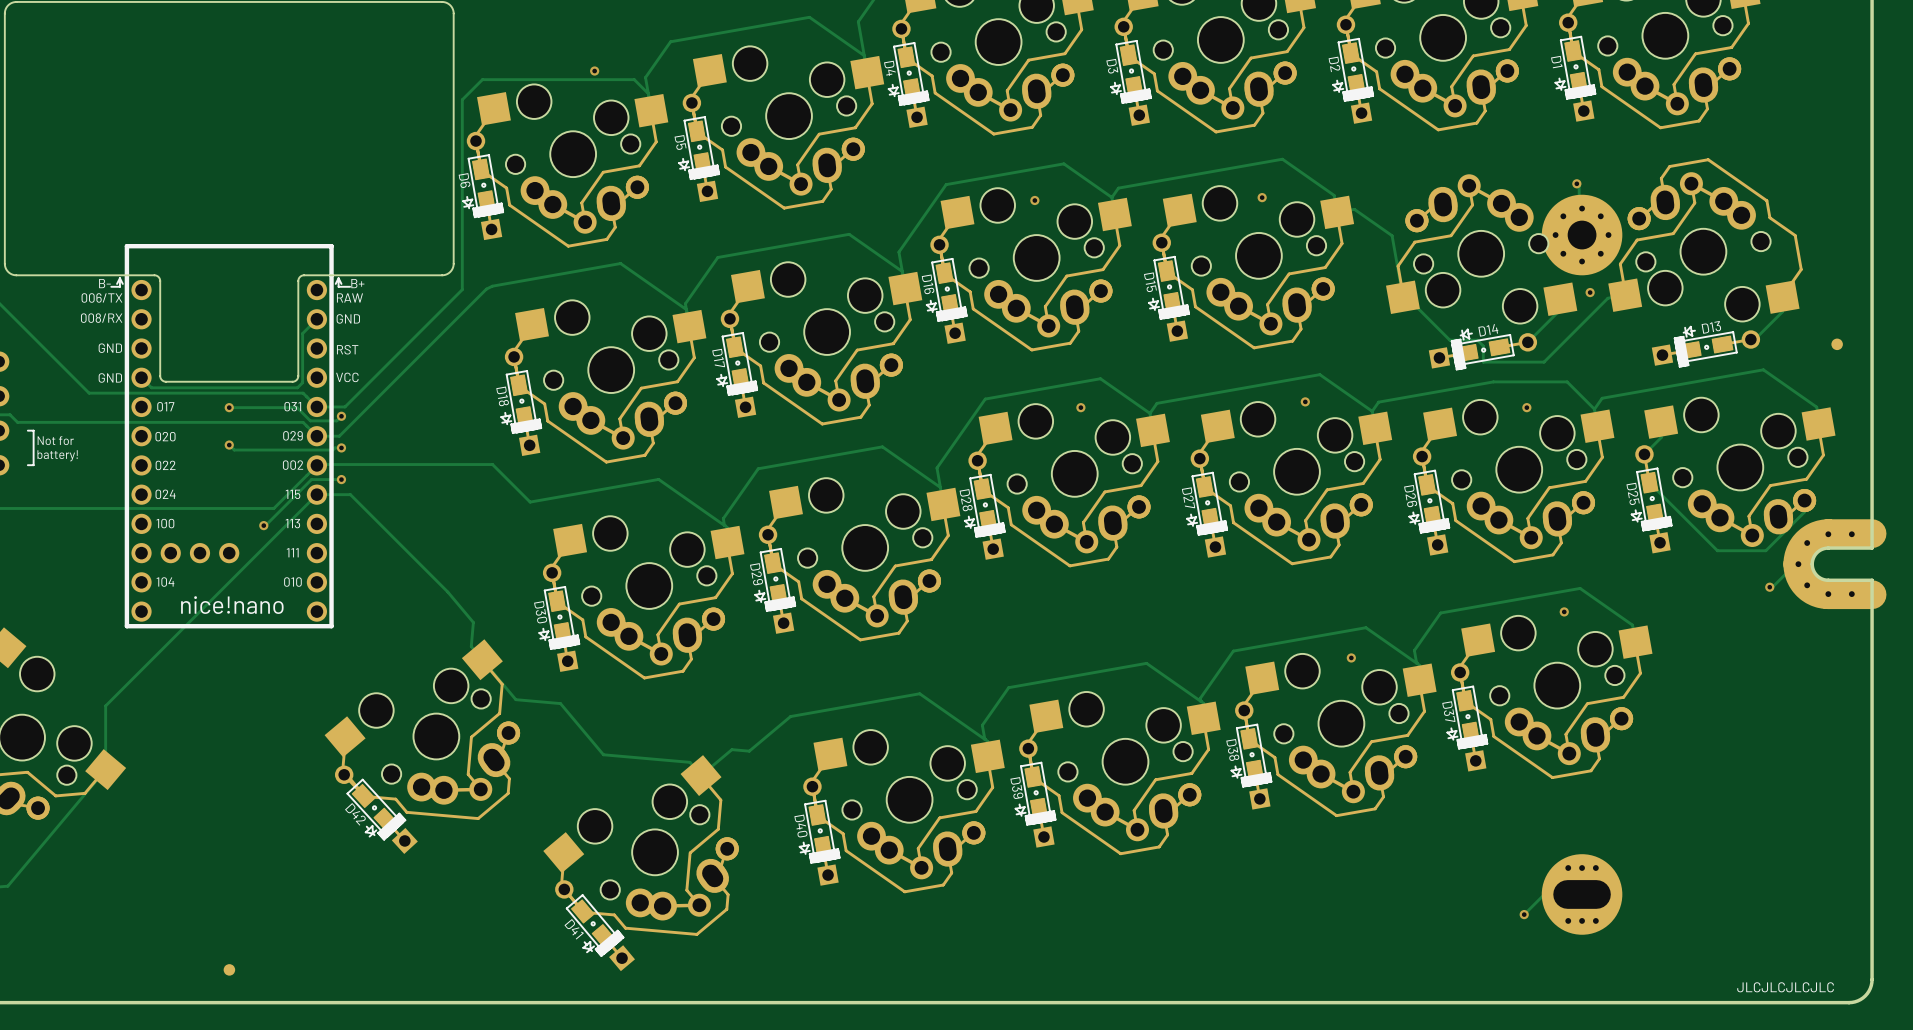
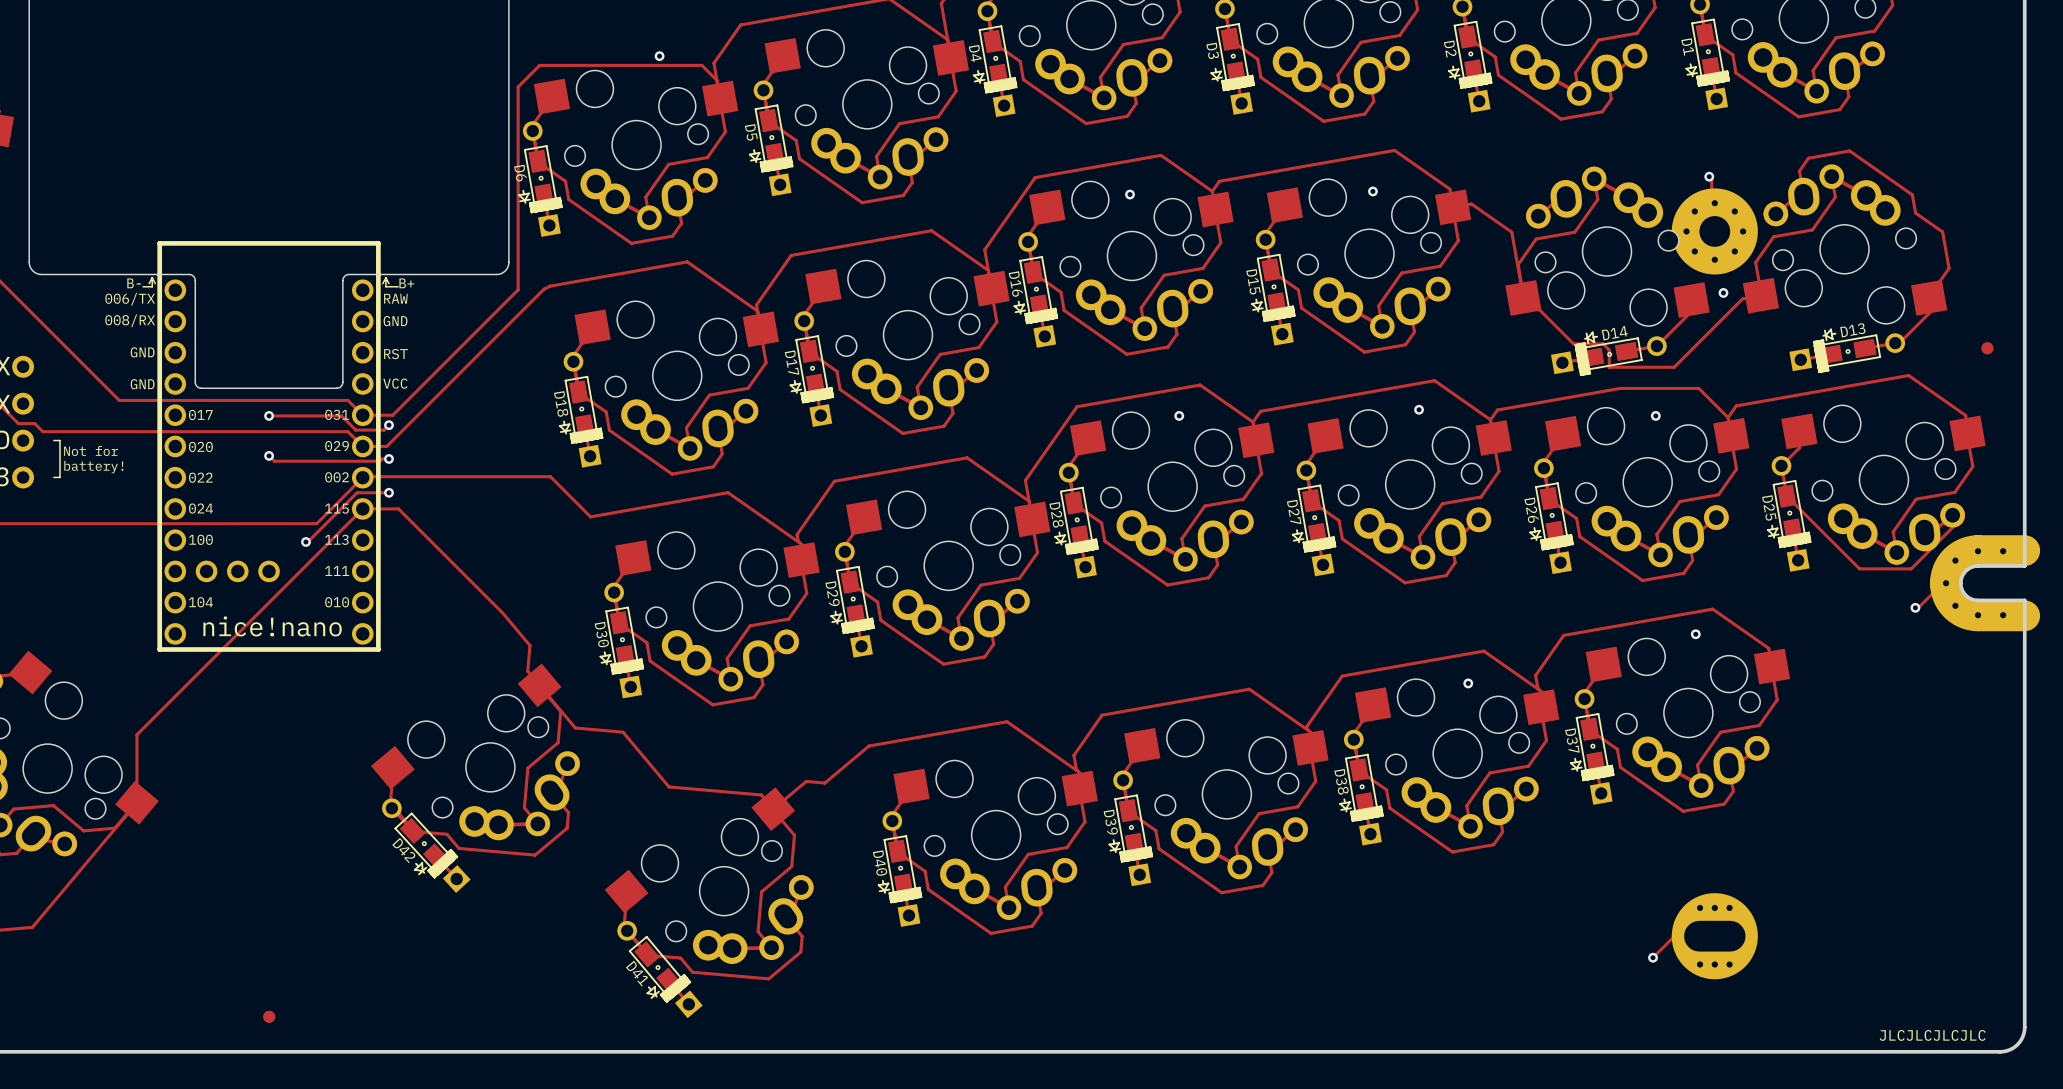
track: (316, 319) (302, 333) (302, 382) (297, 387) (151, 387) (141, 377) -> none

